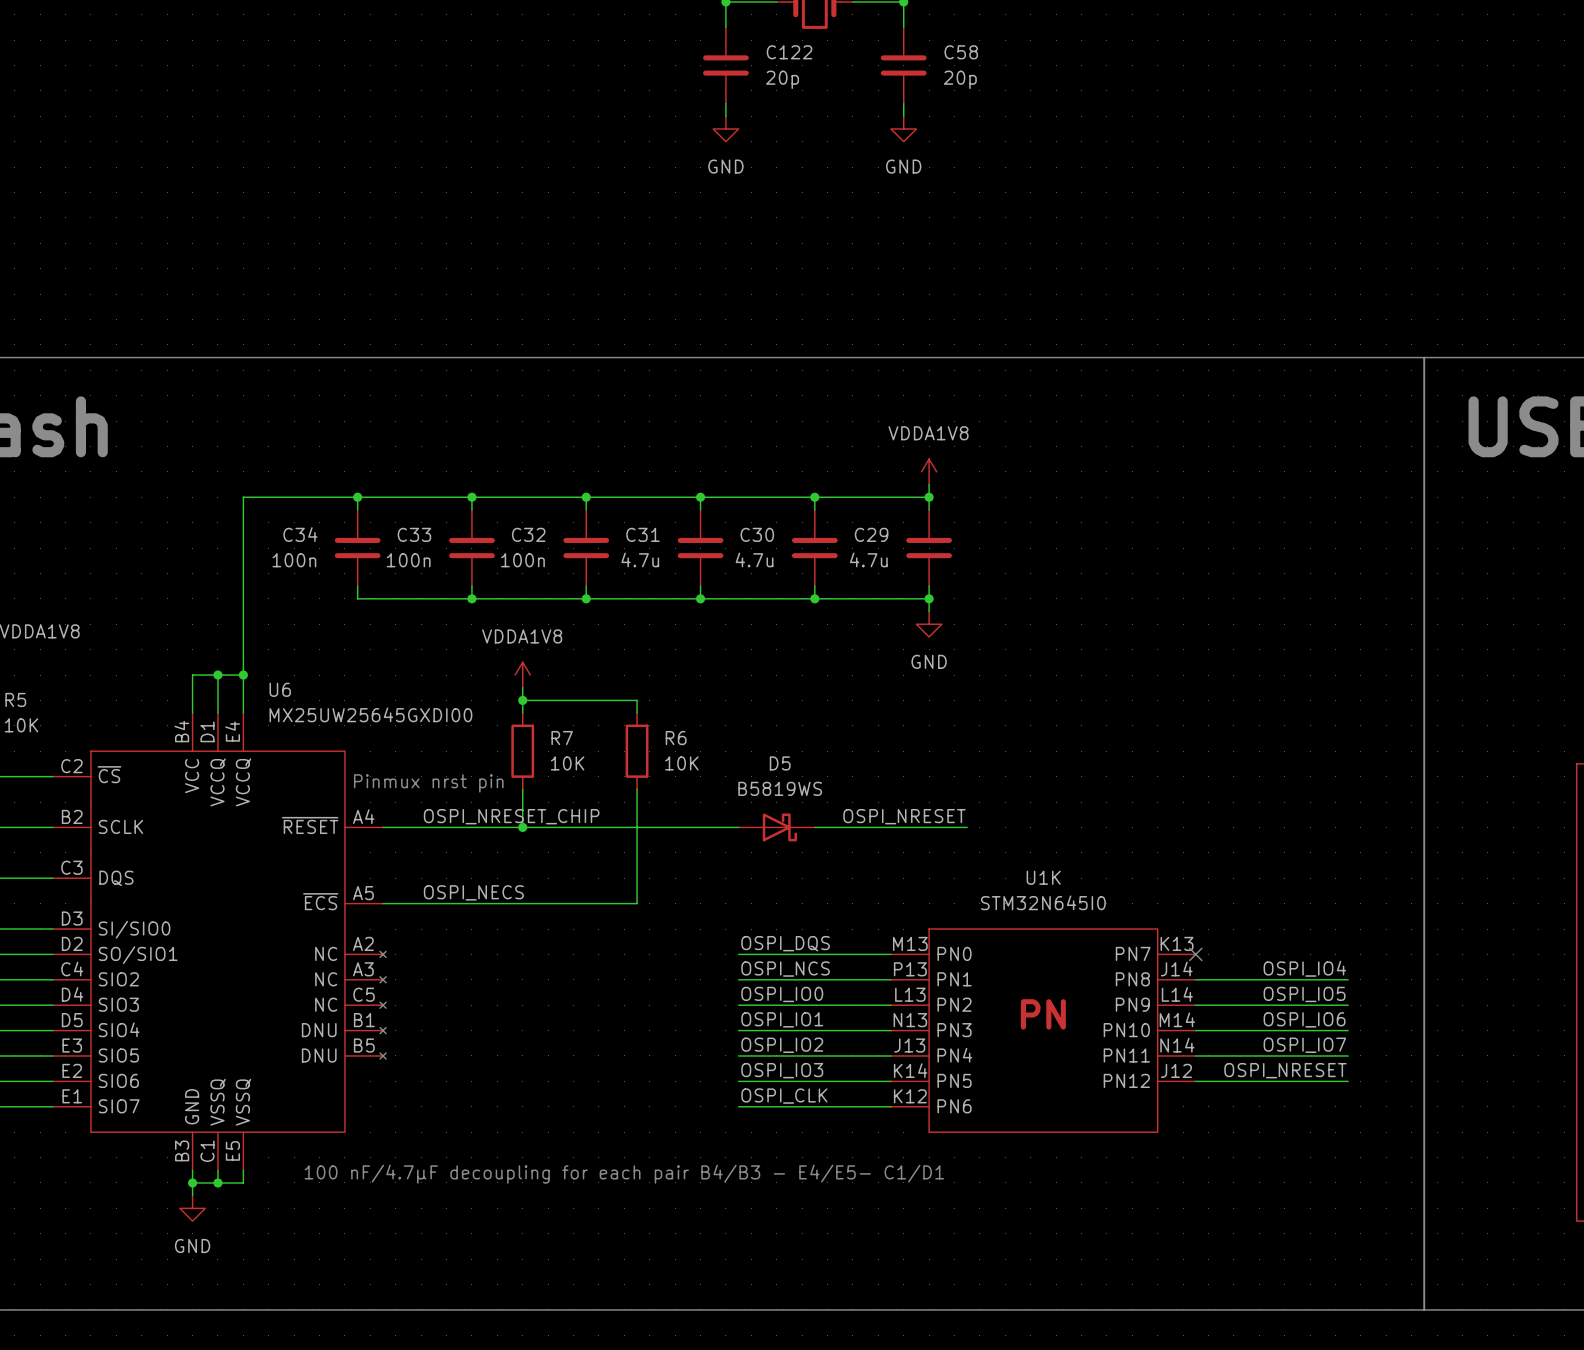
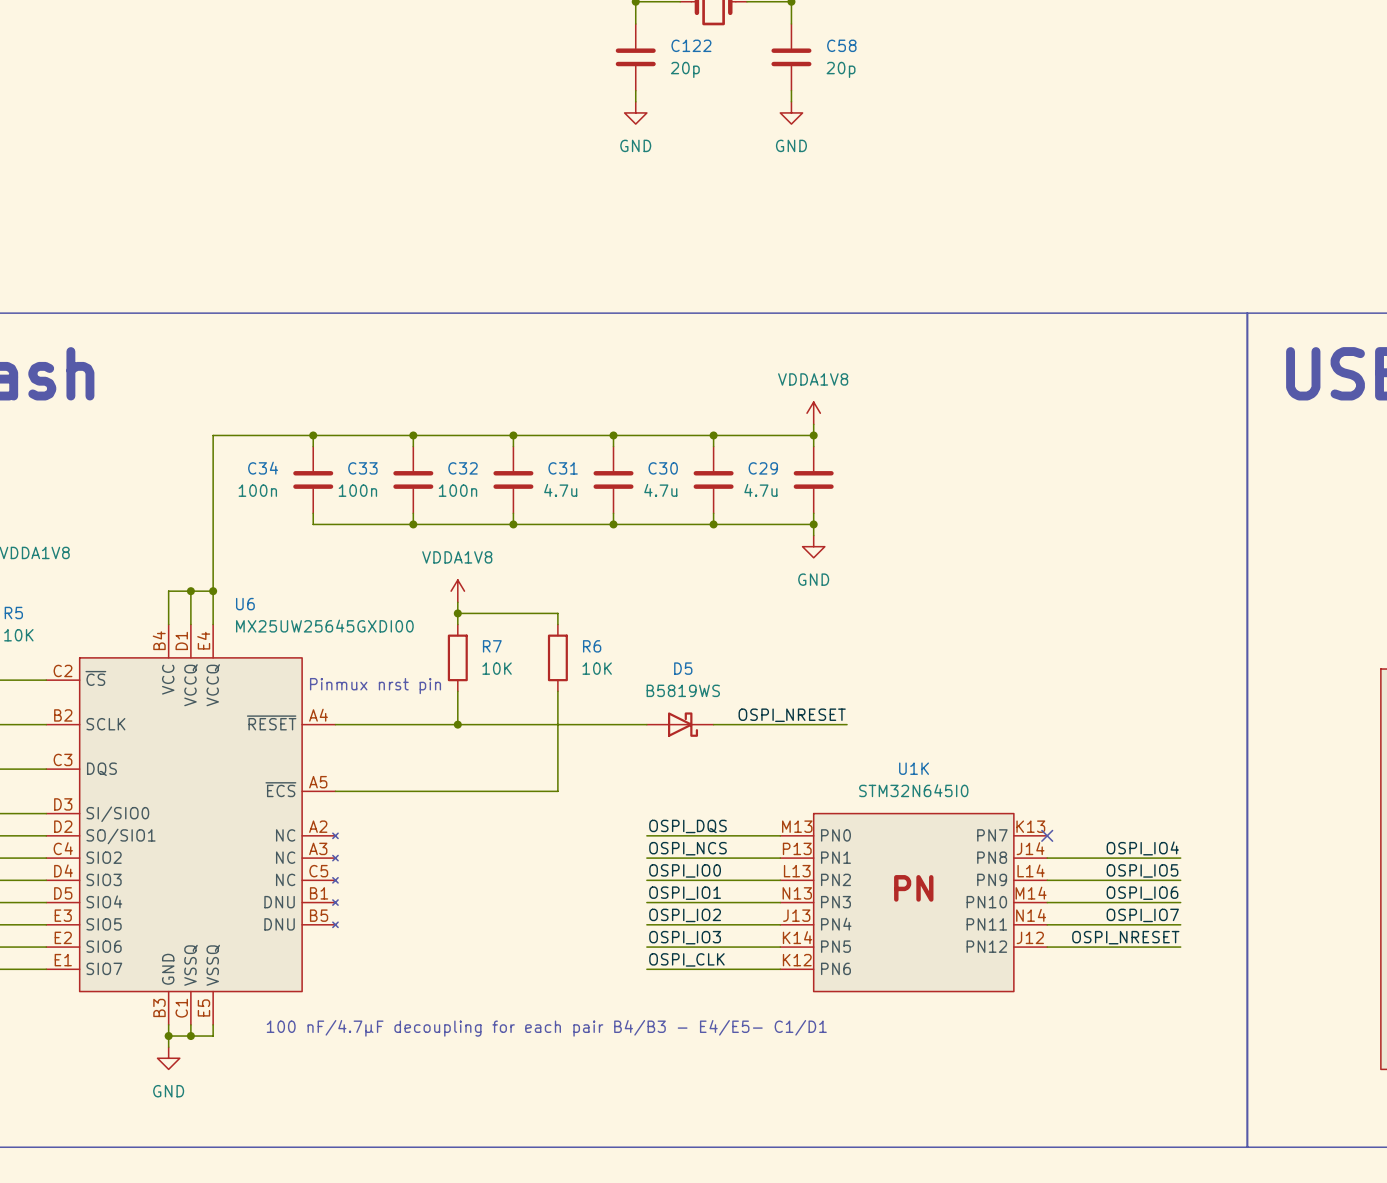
label: OSPI_NRESET_CHIP (511, 816) -> none
label: OSPI_NECS (473, 892) -> none

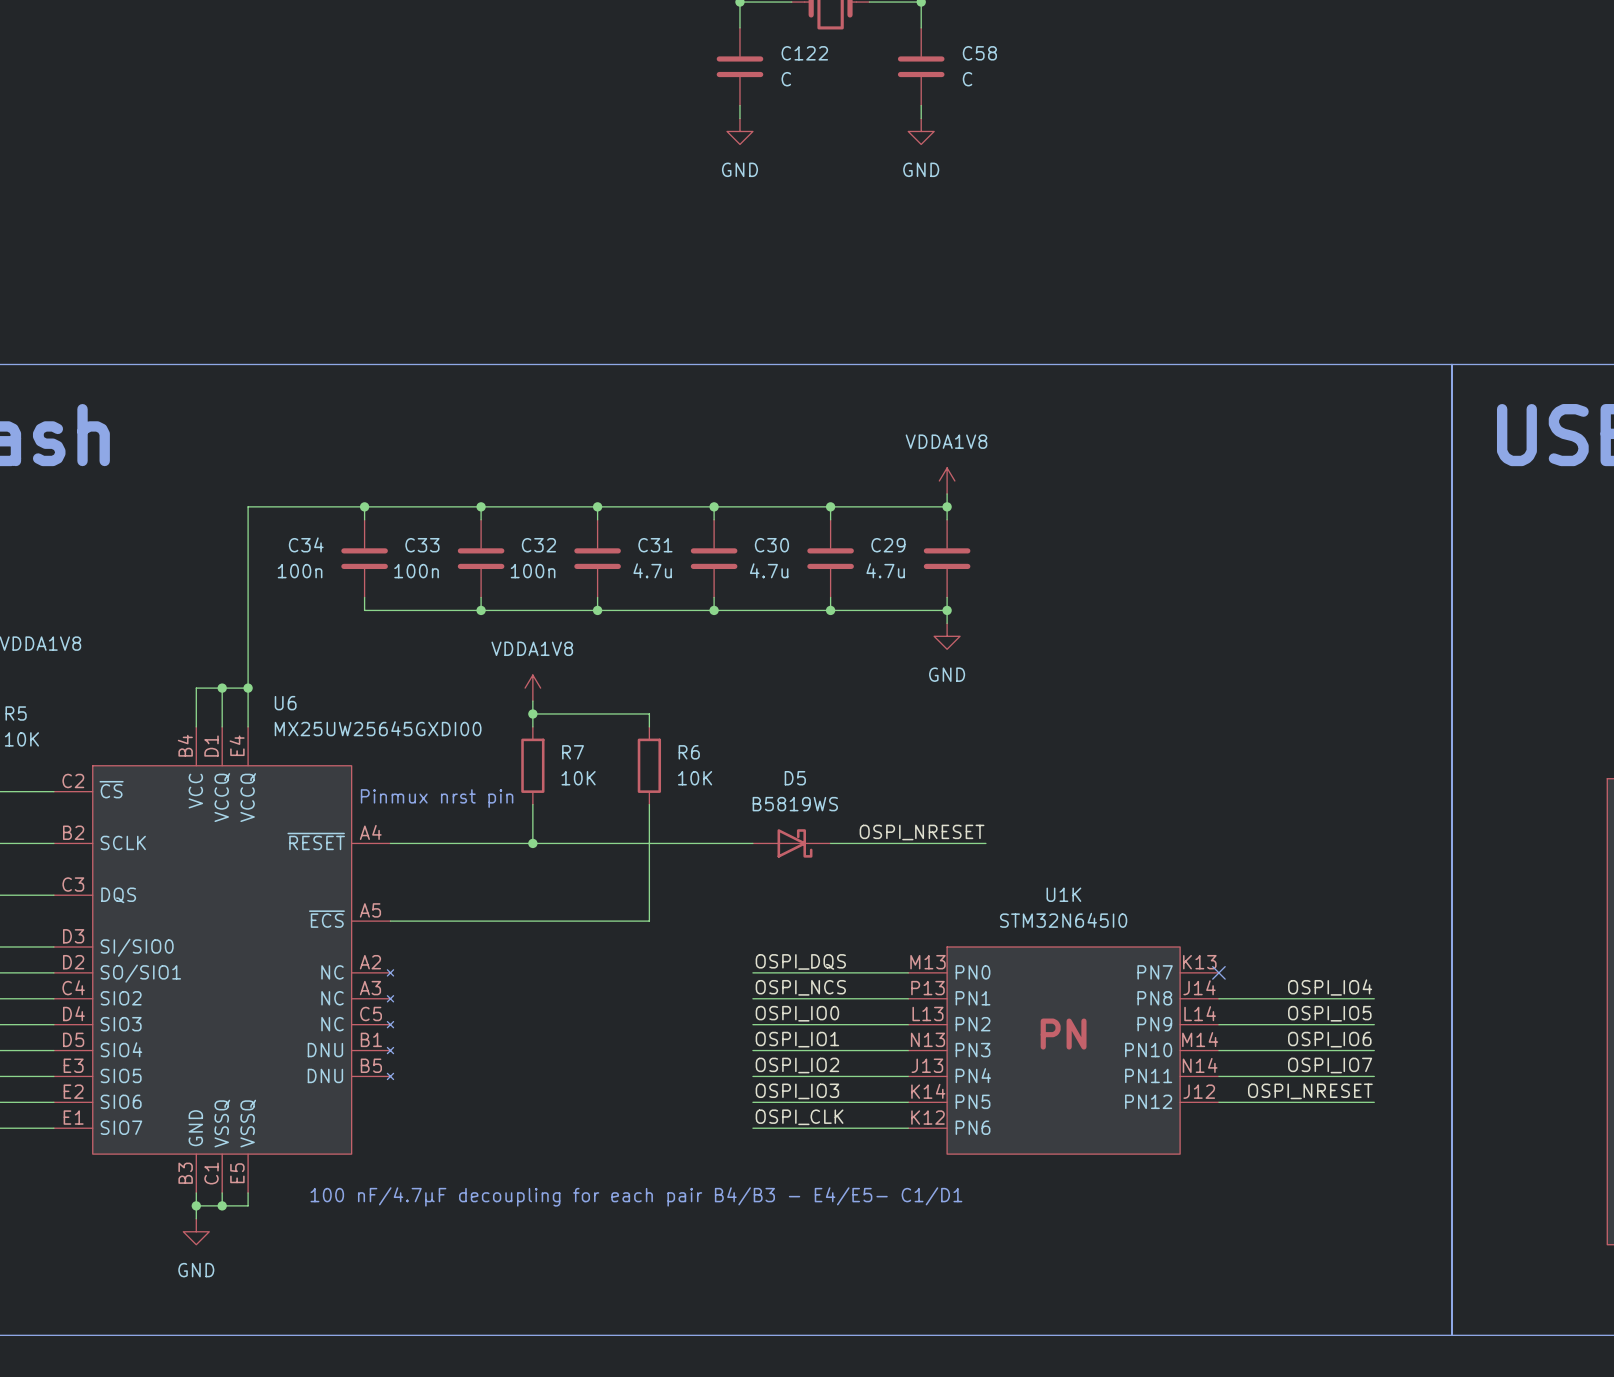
C122 value: 20p (685, 69) -> C (786, 79)
C58 value: 20p (841, 69) -> C (967, 79)

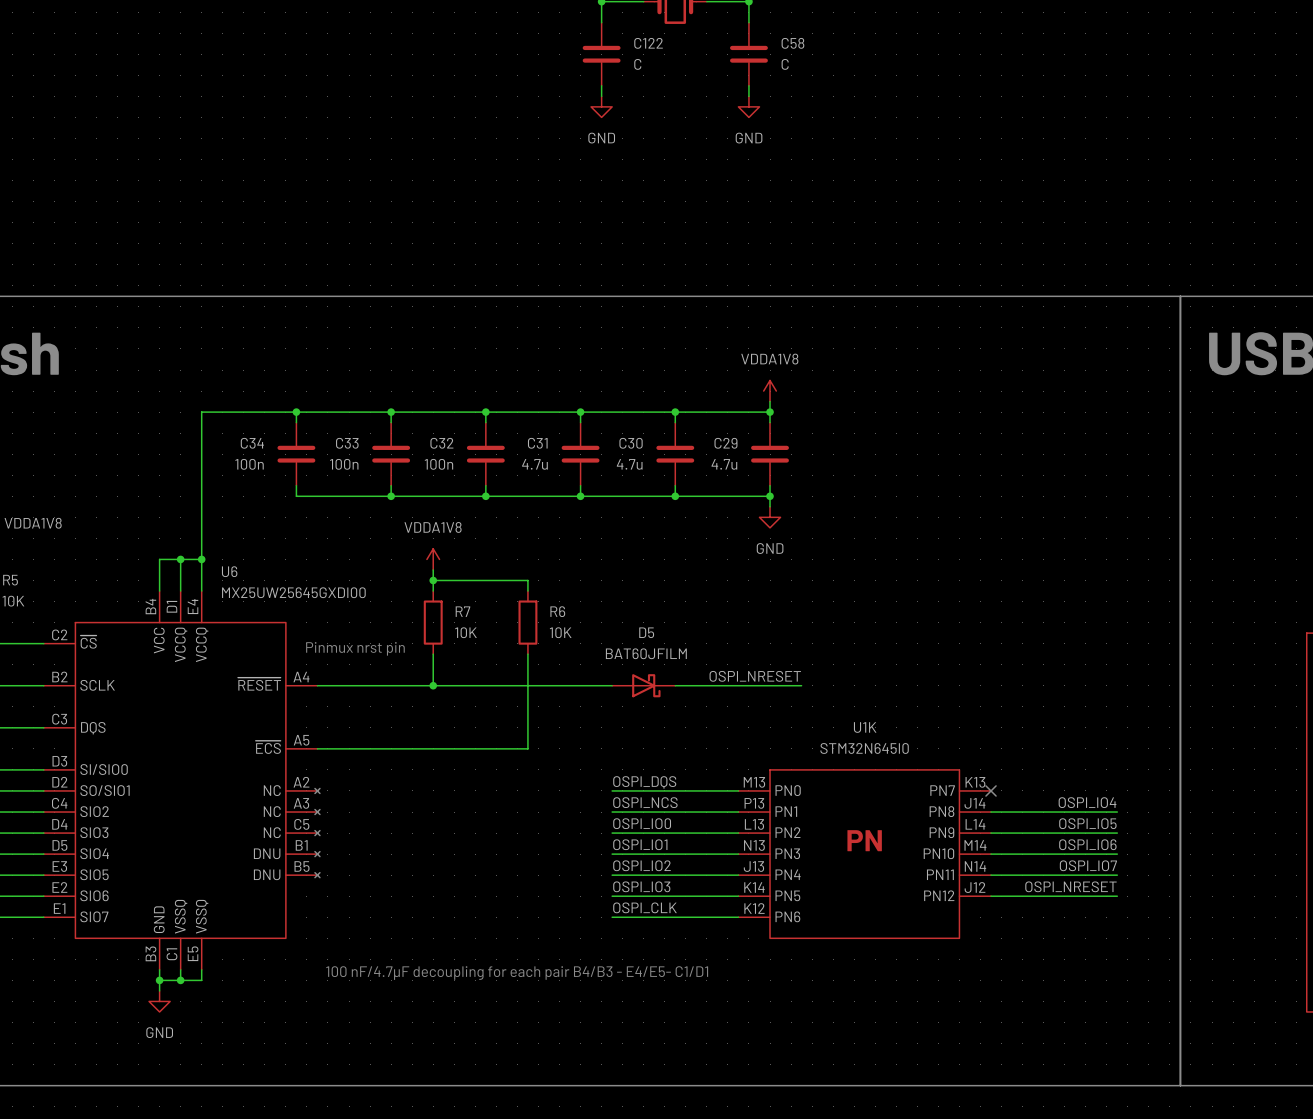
D5 value: B5819WS (795, 804) -> BAT60JFILM (646, 653)

